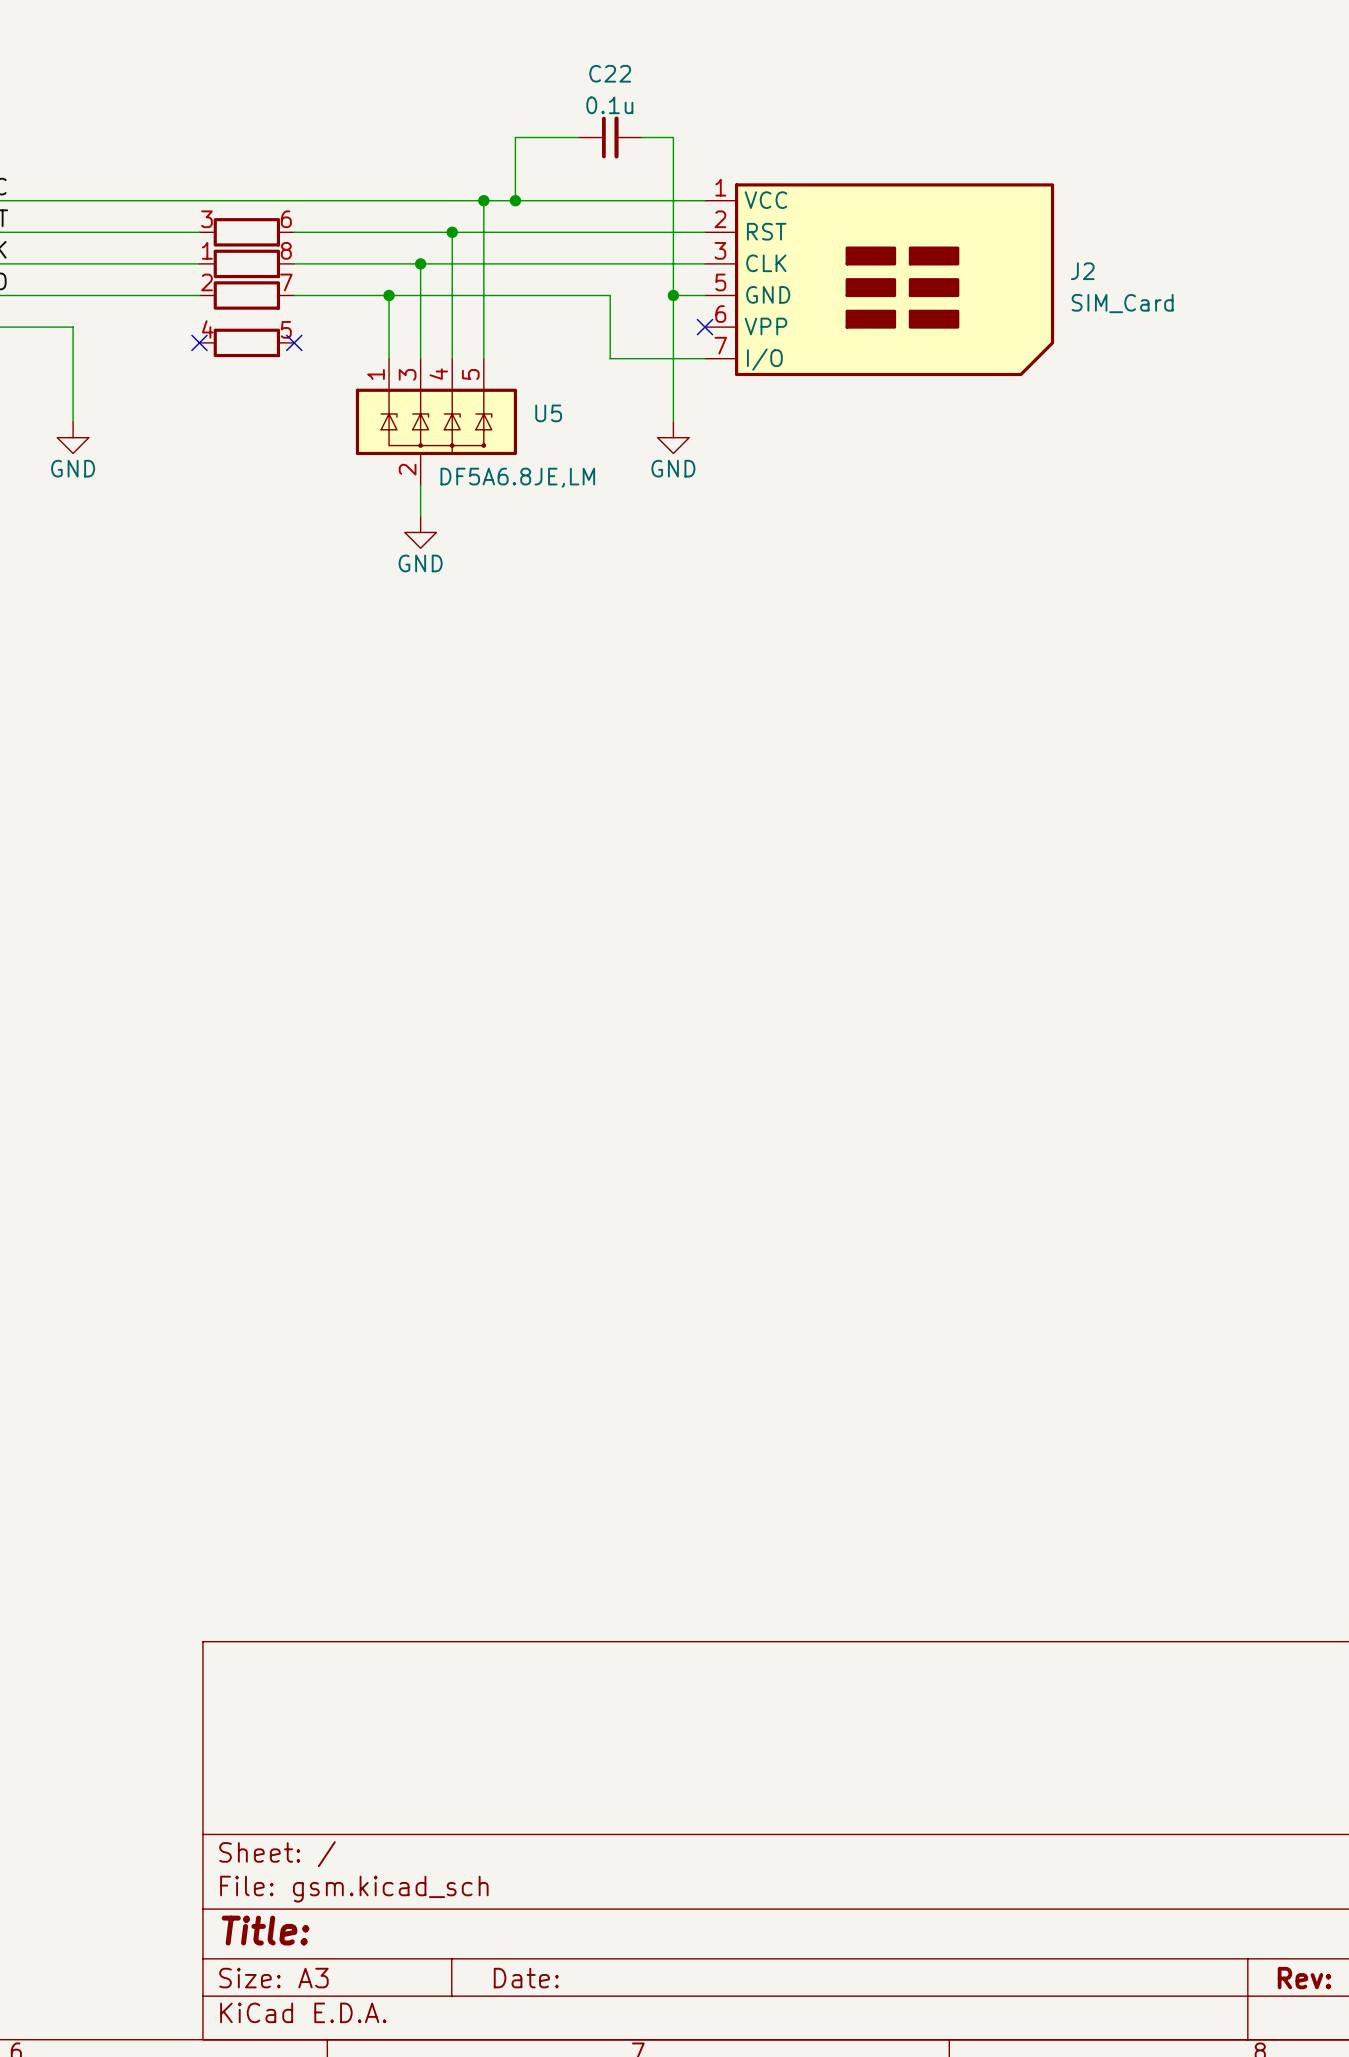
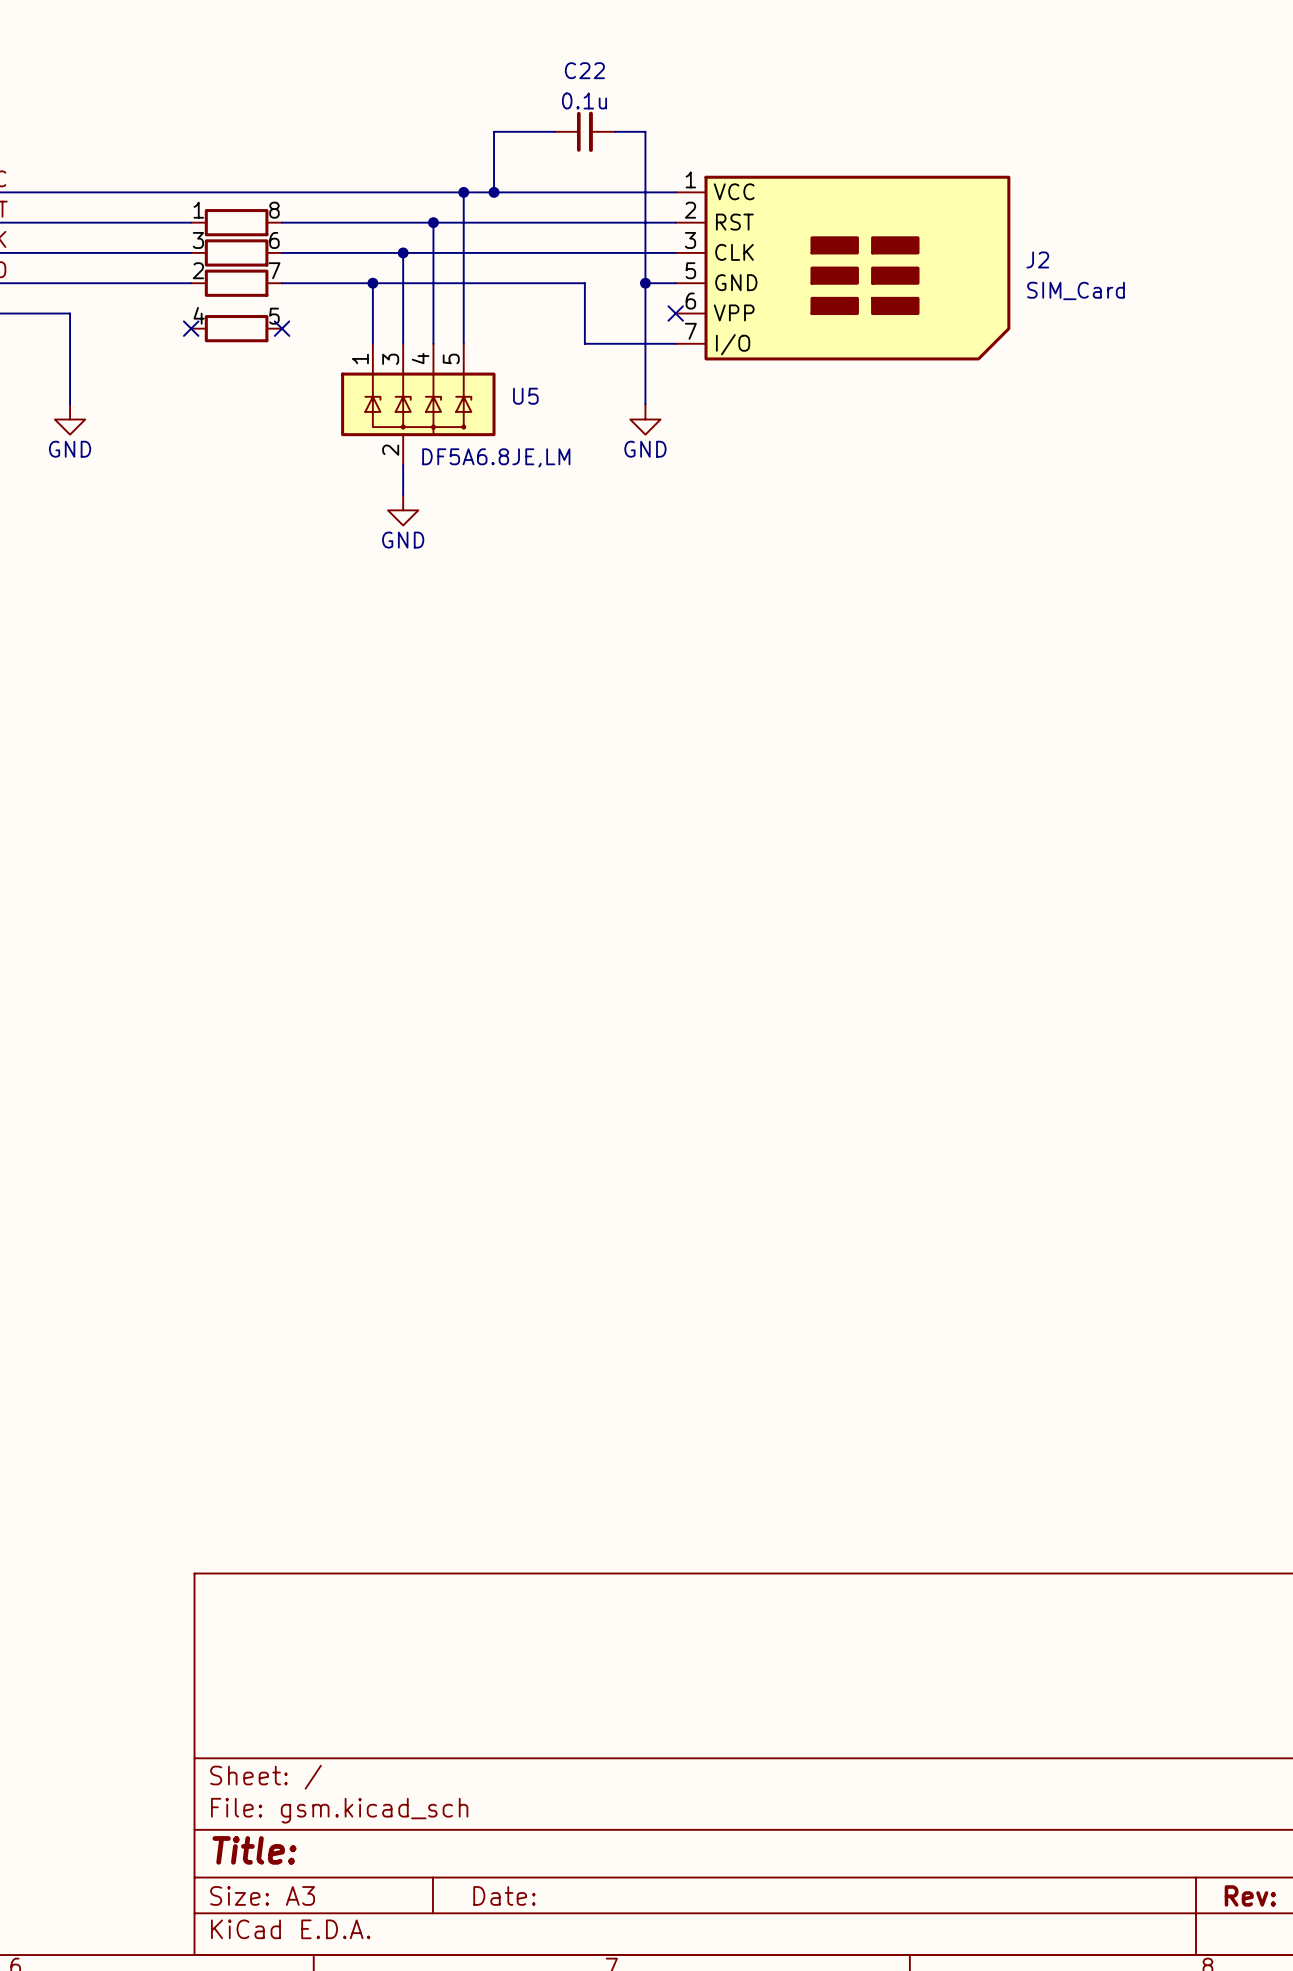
part pin number: 3 (206, 219) -> 1 (198, 210)
part pin number: 6 (286, 219) -> 8 (274, 210)
part pin number: 1 (207, 250) -> 3 (198, 240)
part pin number: 8 (286, 250) -> 6 (274, 240)

